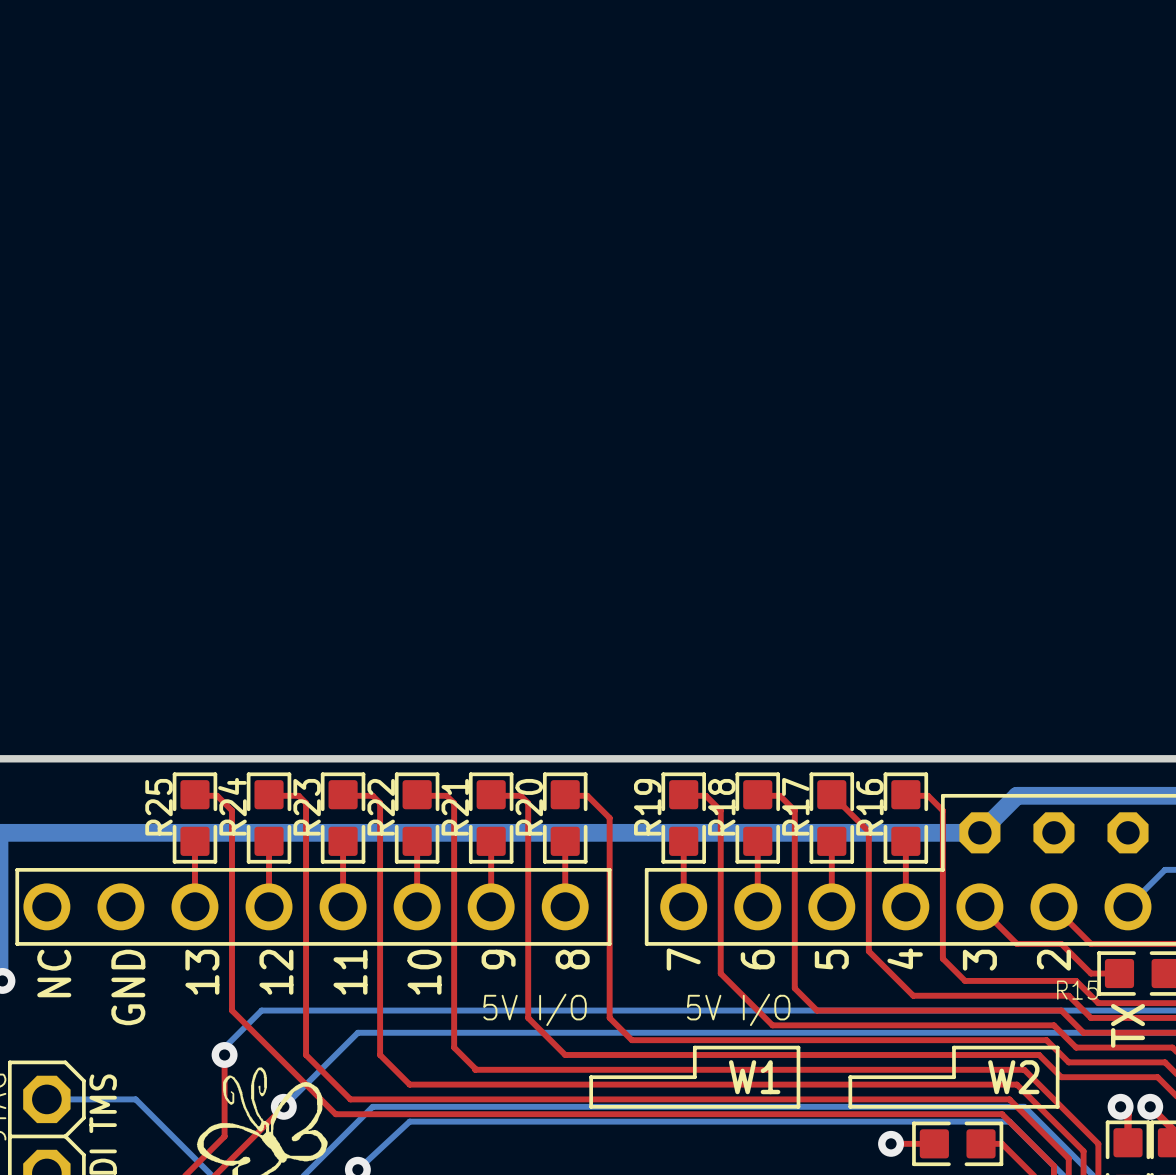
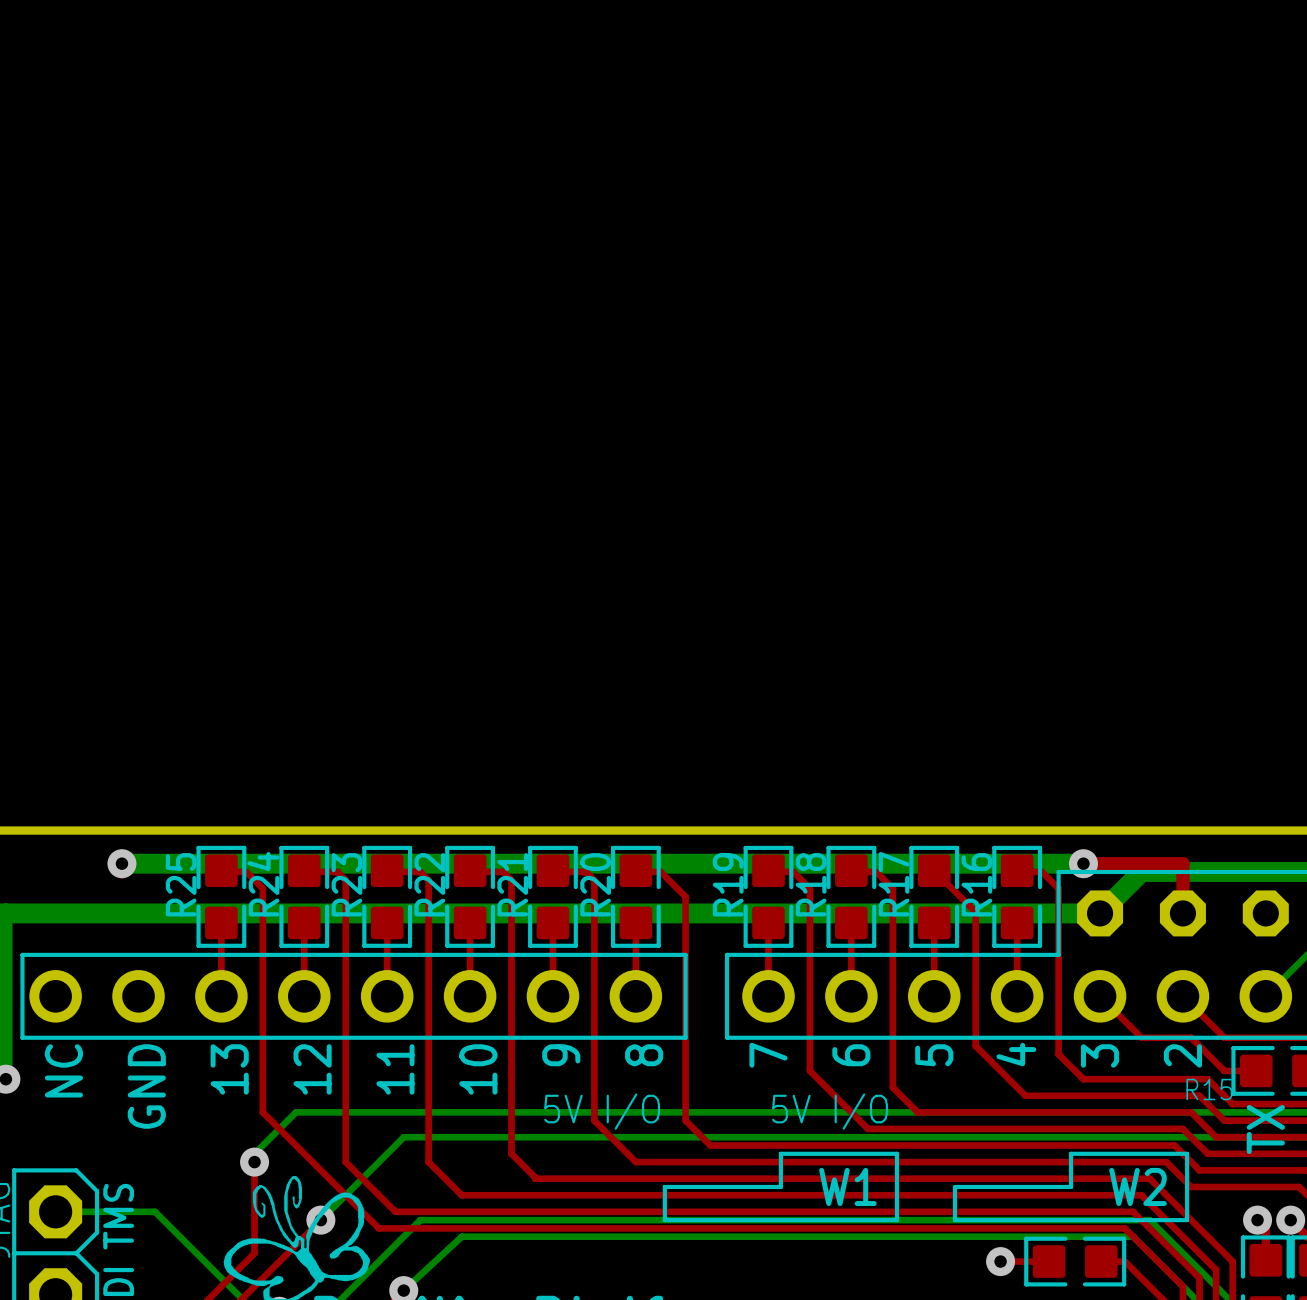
bottom track: none -> (121, 863) (1083, 863)
via: none -> (121, 863)
top track: none -> (1083, 863) (1182, 863) (1182, 913)
via: none -> (1083, 863)

